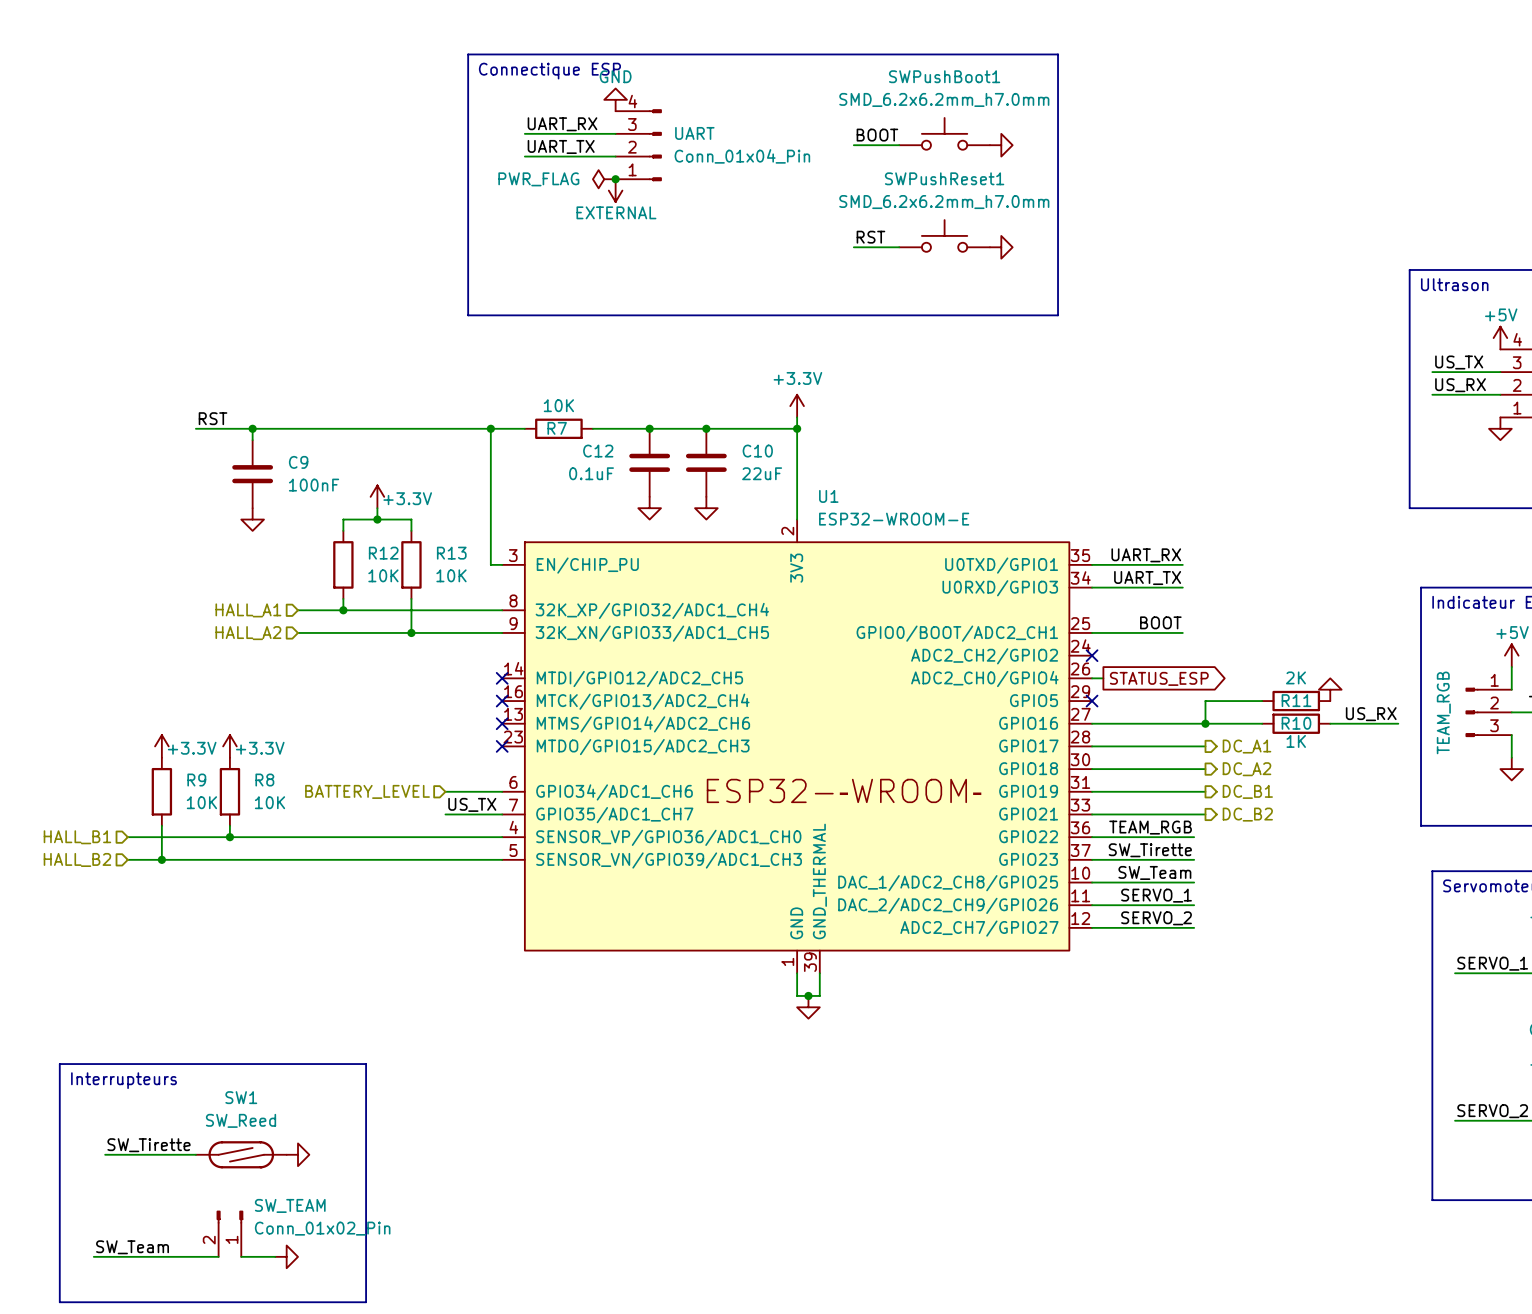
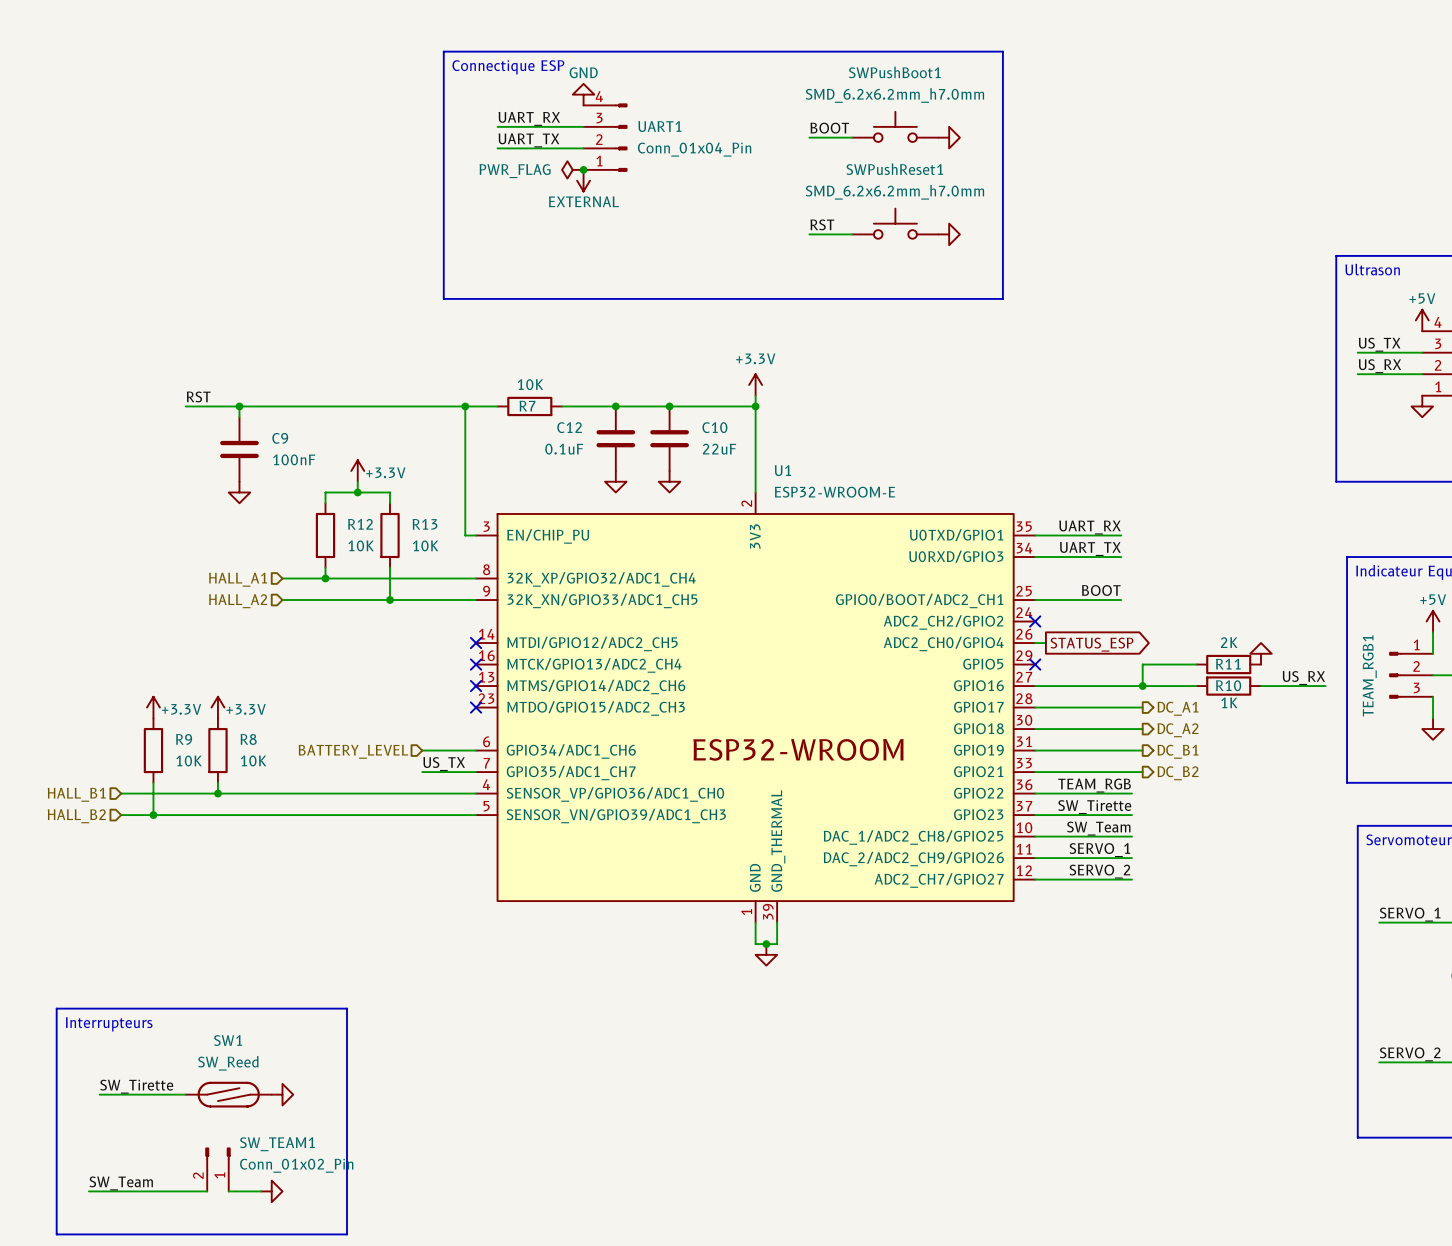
UART name: UART (694, 133) -> UART1 (659, 126)
TEAM_RGB name: TEAM_RGB (1443, 712) -> TEAM_RGB1 (1369, 675)
SW_TEAM name: SW_TEAM (290, 1205) -> SW_TEAM1 (277, 1144)

